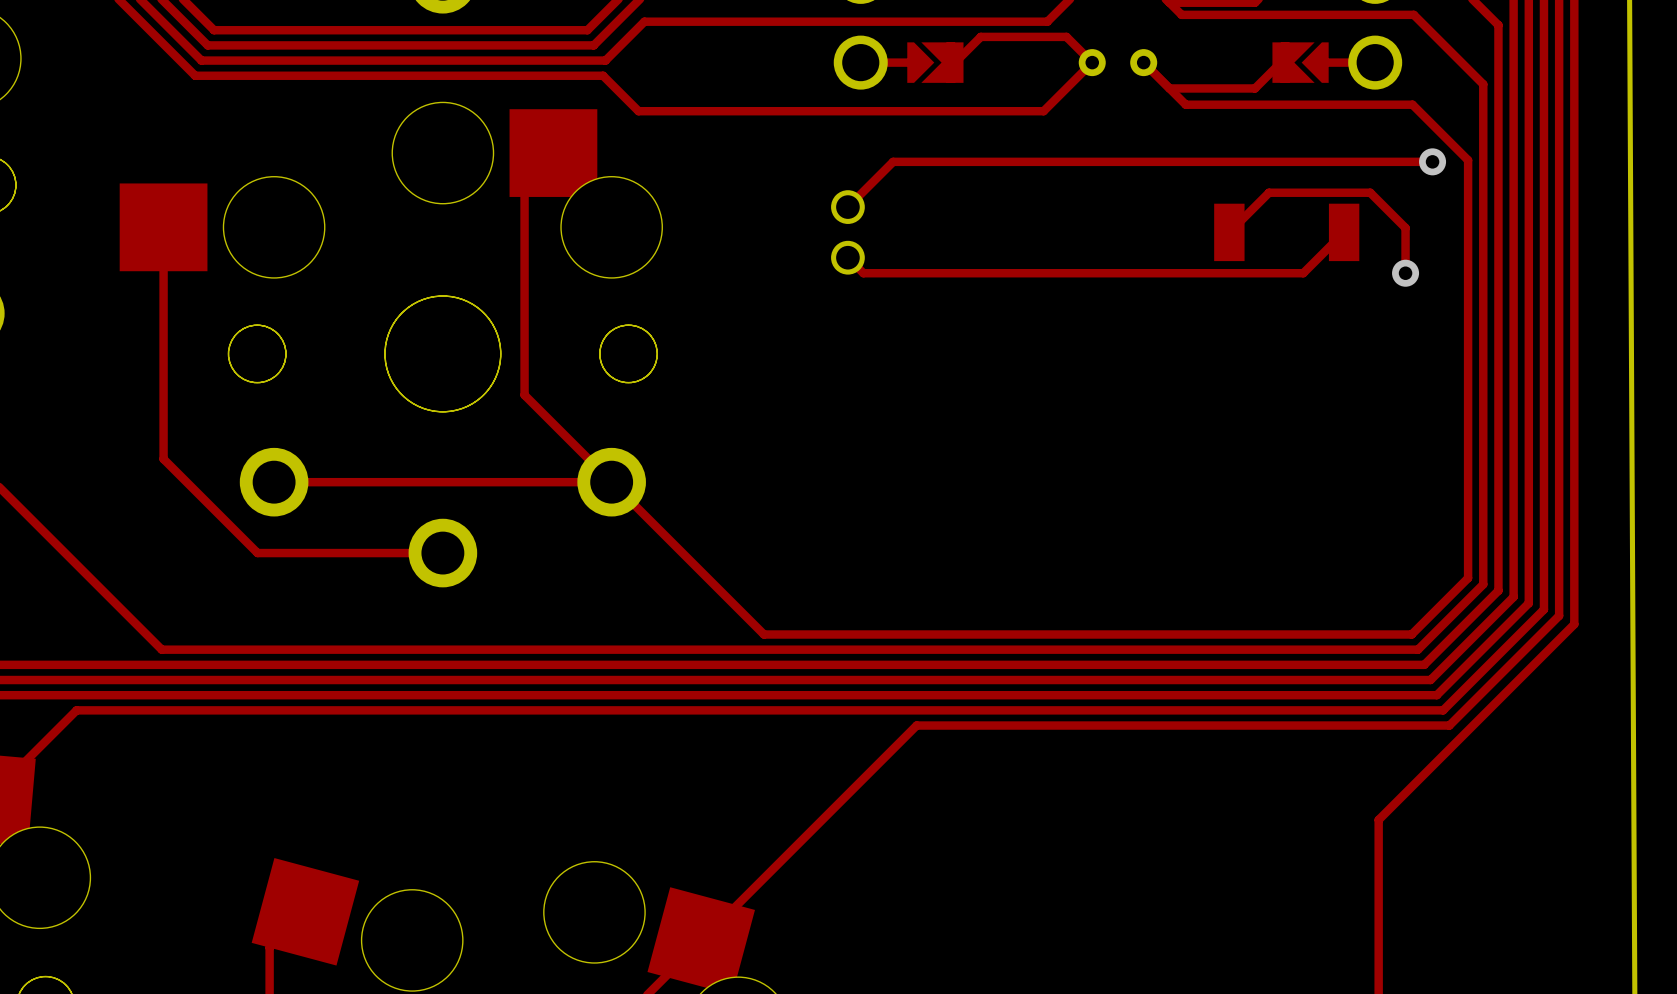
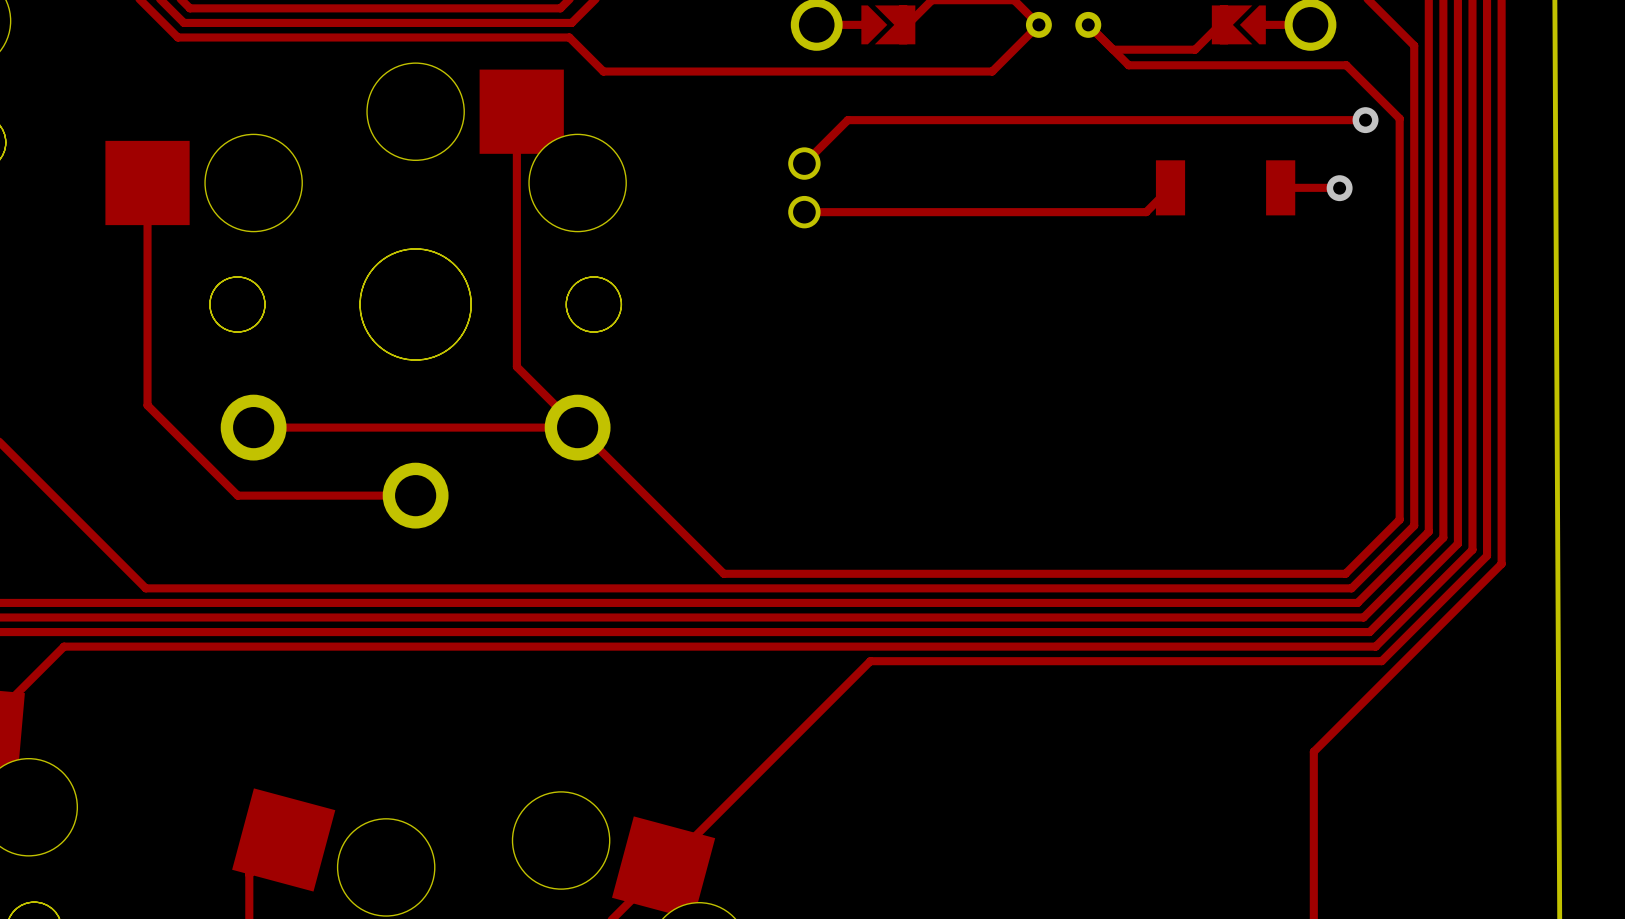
track: (524, 181) (524, 395) (548, 418) -> (521, 111) (516, 116) (516, 366)
track: (1229, 232) (1269, 192) (1370, 192) (1405, 227) (1405, 273) -> none
track: (1344, 232) (1303, 273) (863, 273) (847, 257) -> (1170, 187) (1146, 212) (804, 212)
track: none -> (1280, 187) (1339, 187)
via position: (1405, 273) -> (1339, 188)

